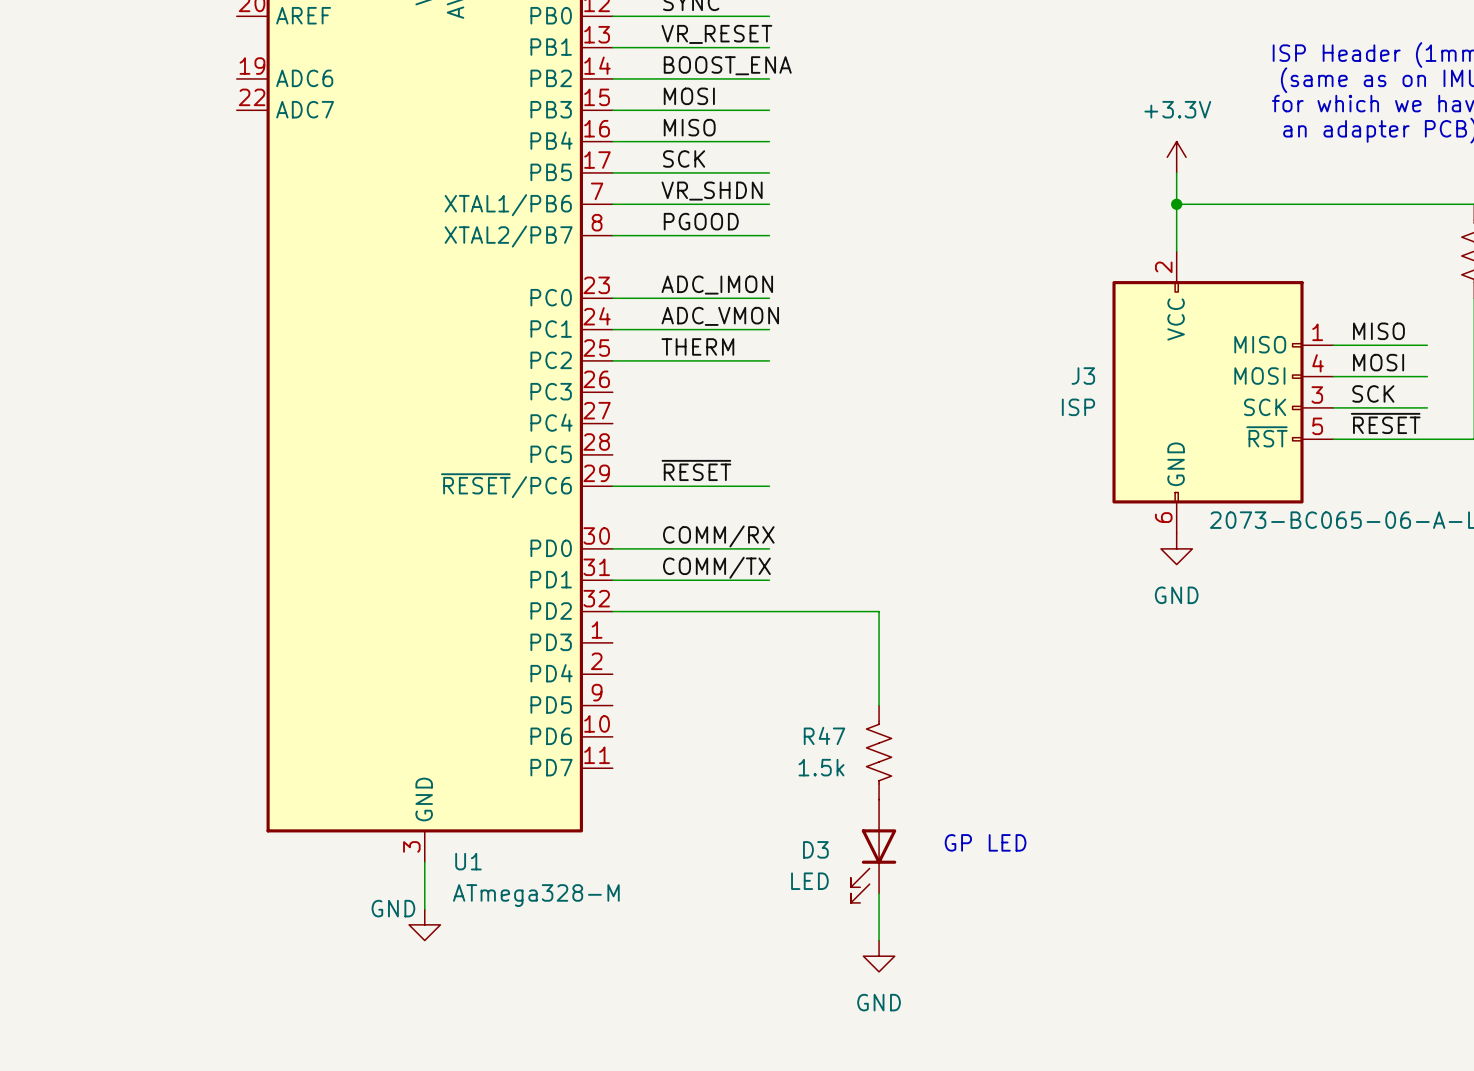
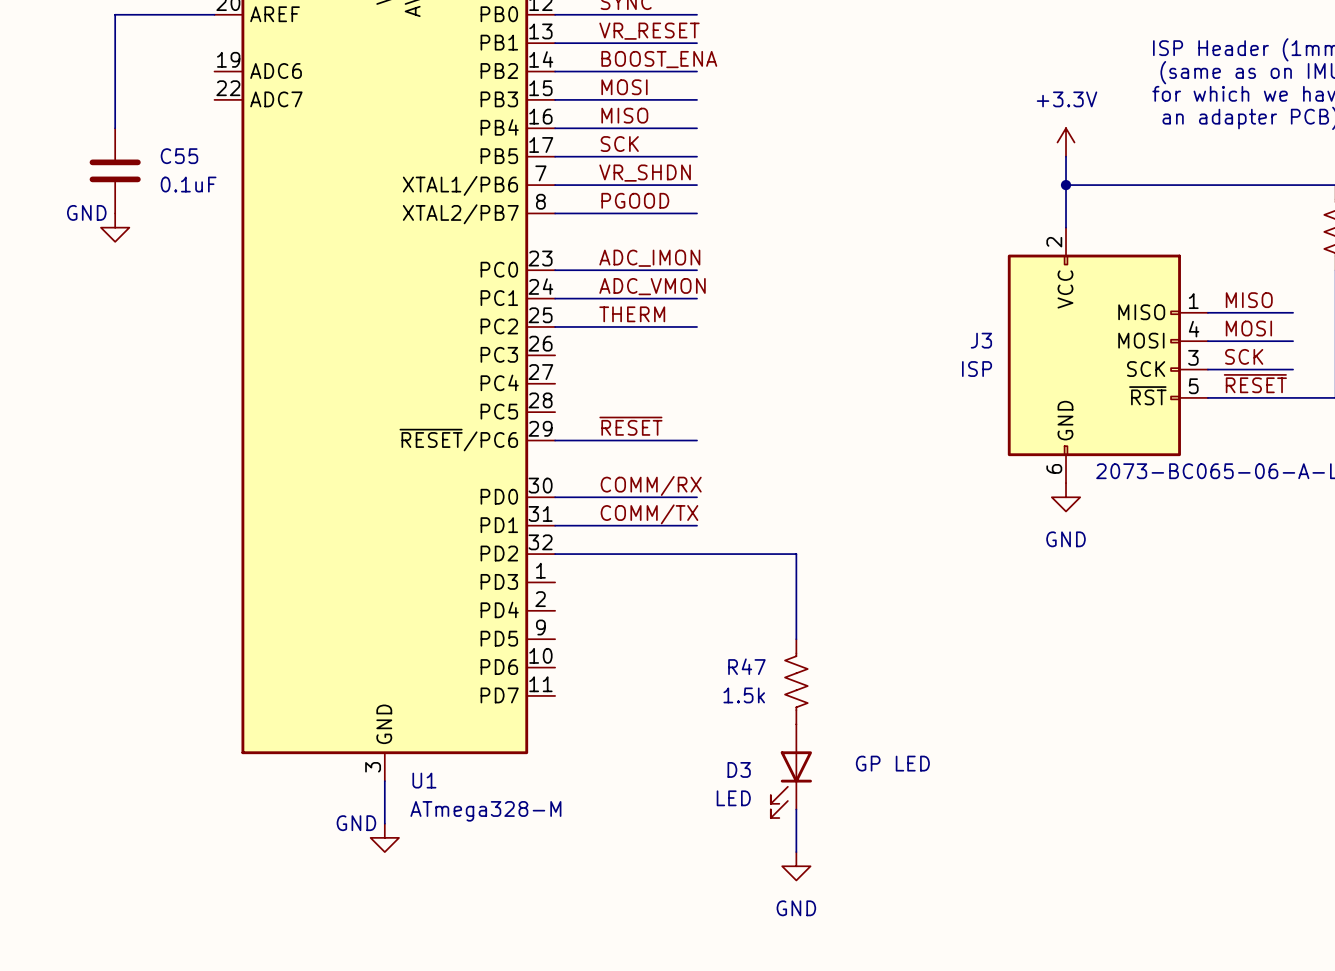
wire: none -> (214, 14) (115, 14) (115, 128)
C55: none -> 0.1uF (115, 170)
power symbol: none -> GND (115, 227)

